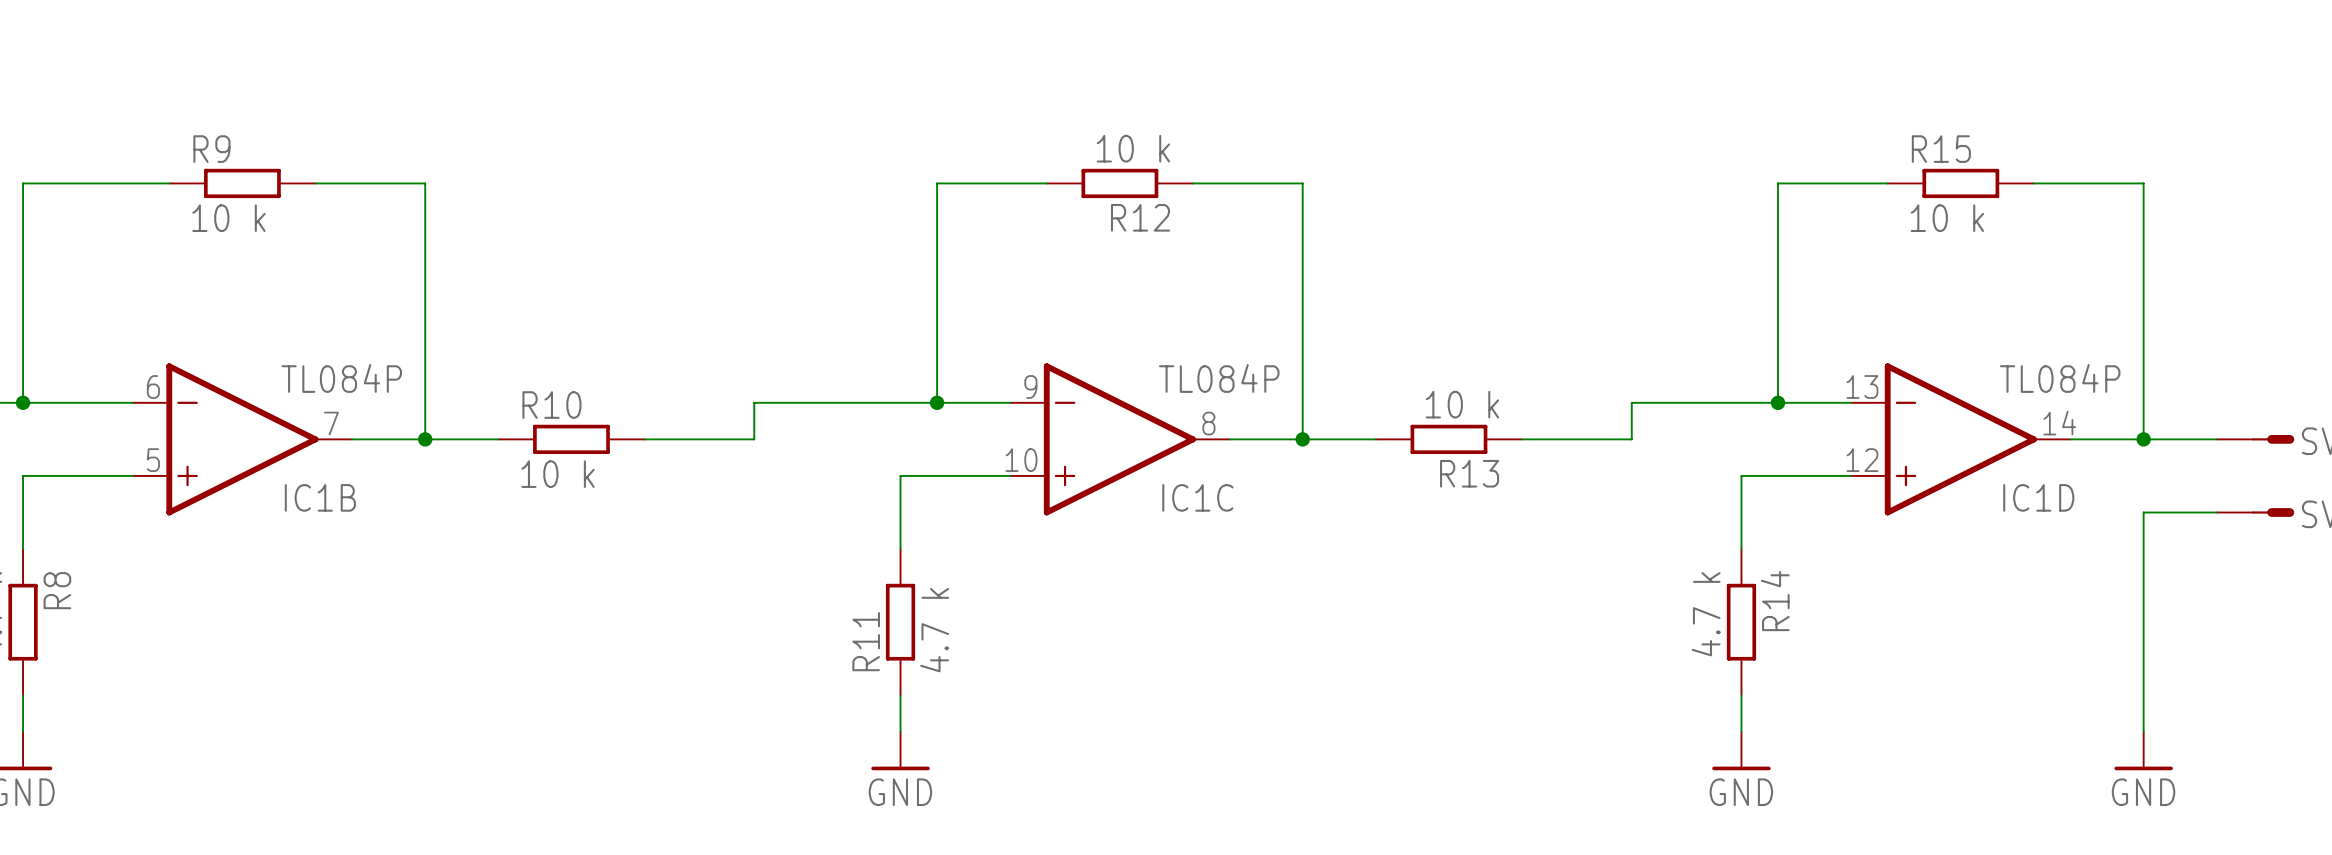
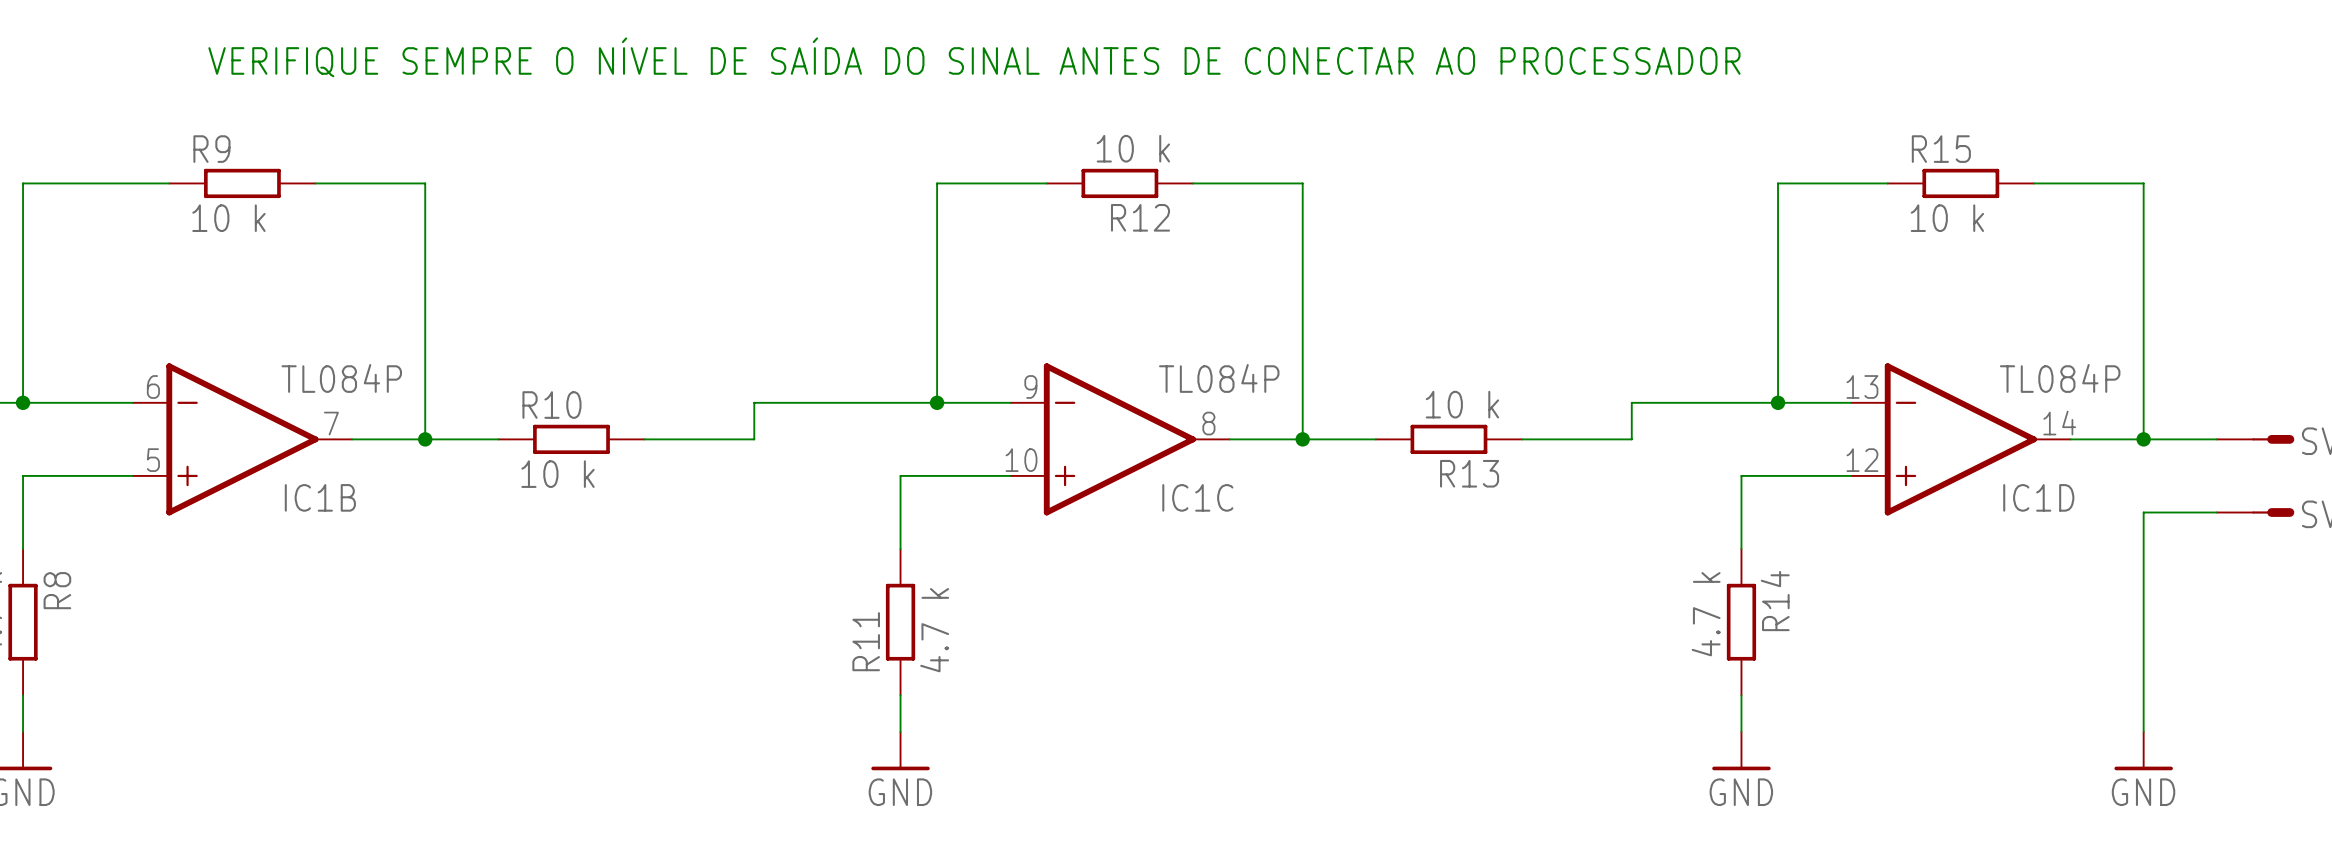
text: none -> VERIFIQUE SEMPRE O NÍVEL DE SAÍDA DO SINAL ANTES DE CONECTAR AO PROCESSADOR (974, 57)

